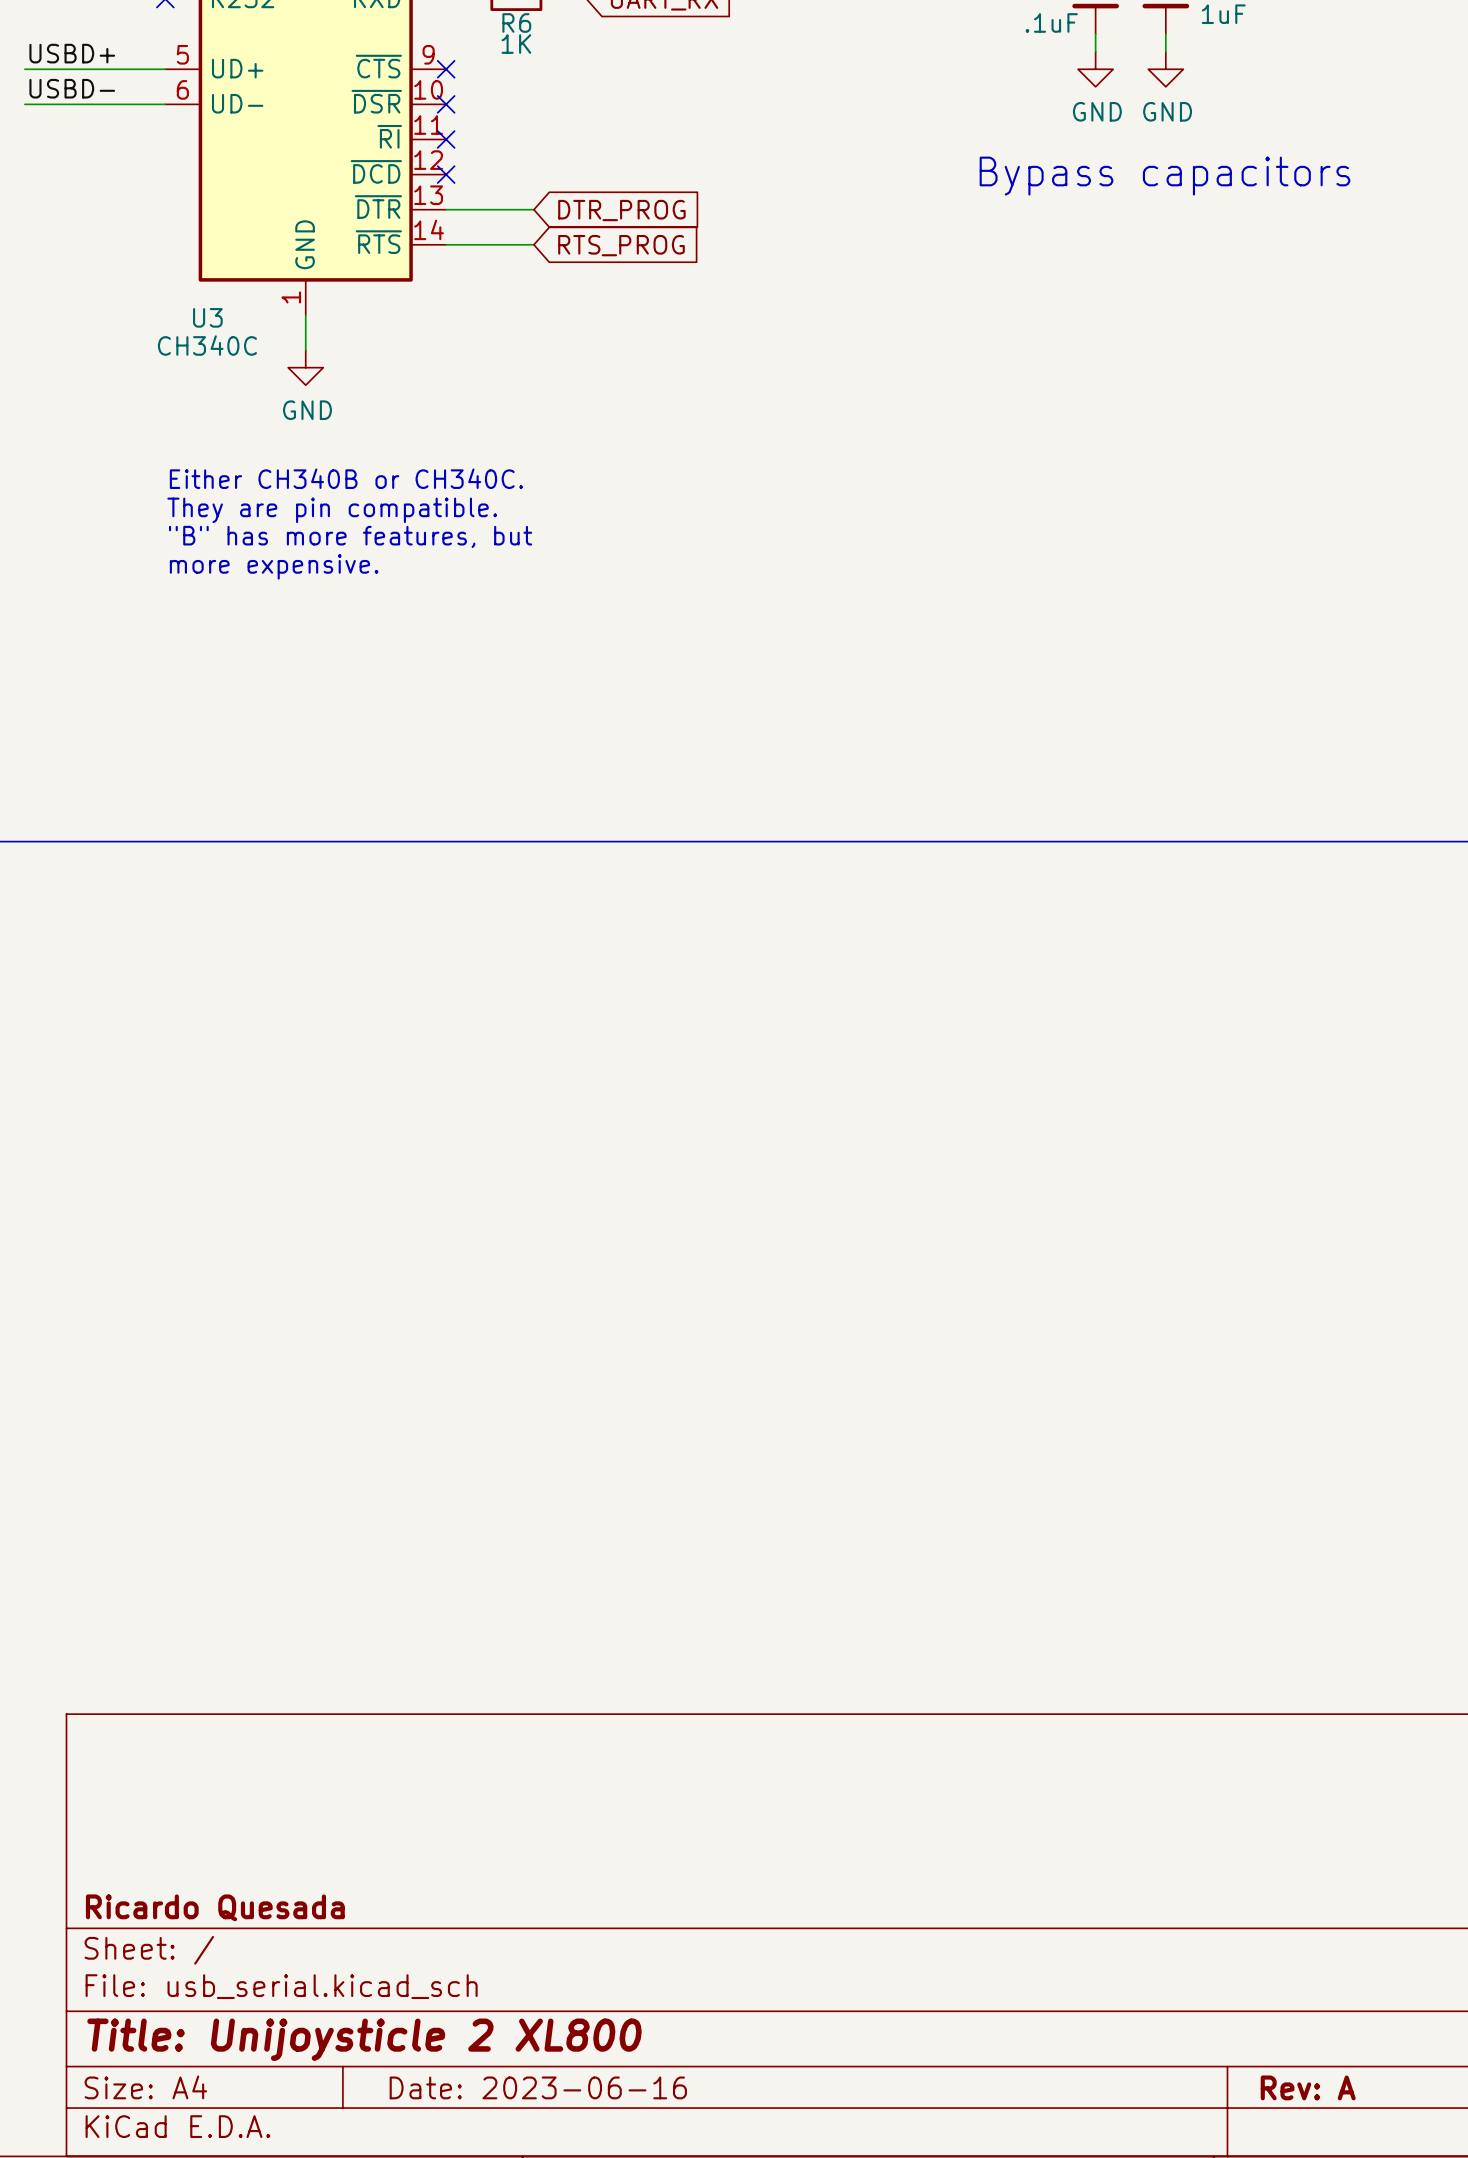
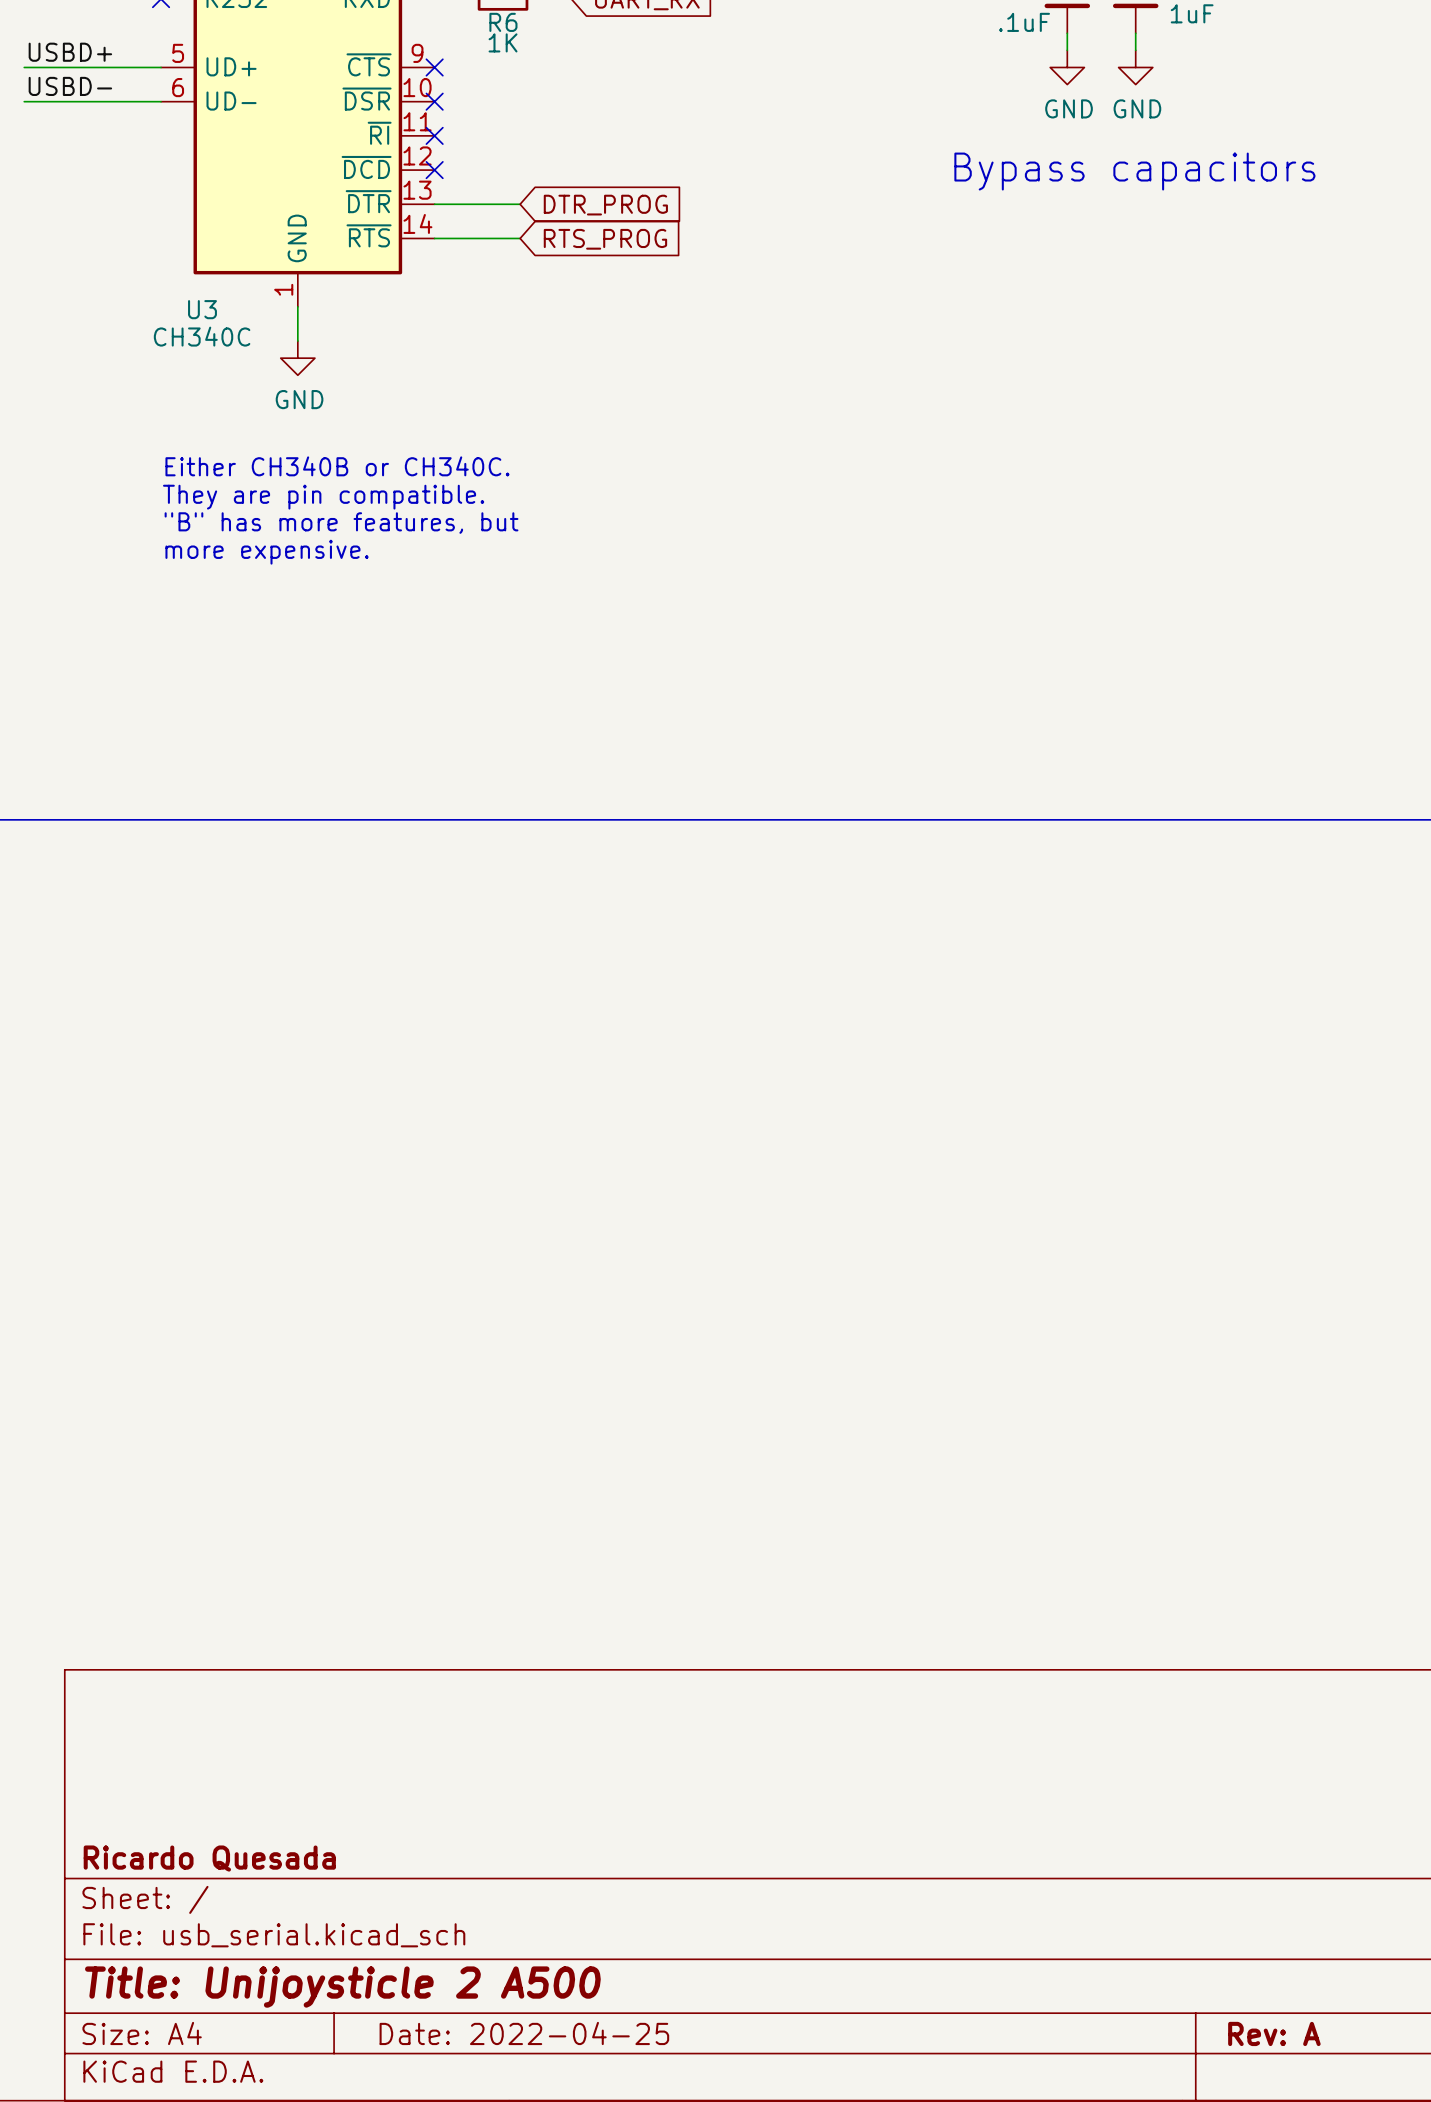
title block: Title: Unijoysticle 2 XL800 (364, 2039) -> Title: Unijoysticle 2 A500 (342, 1987)
title block: Date: 2023-06-16 (538, 2087) -> Date: 2022-04-25 (524, 2033)

